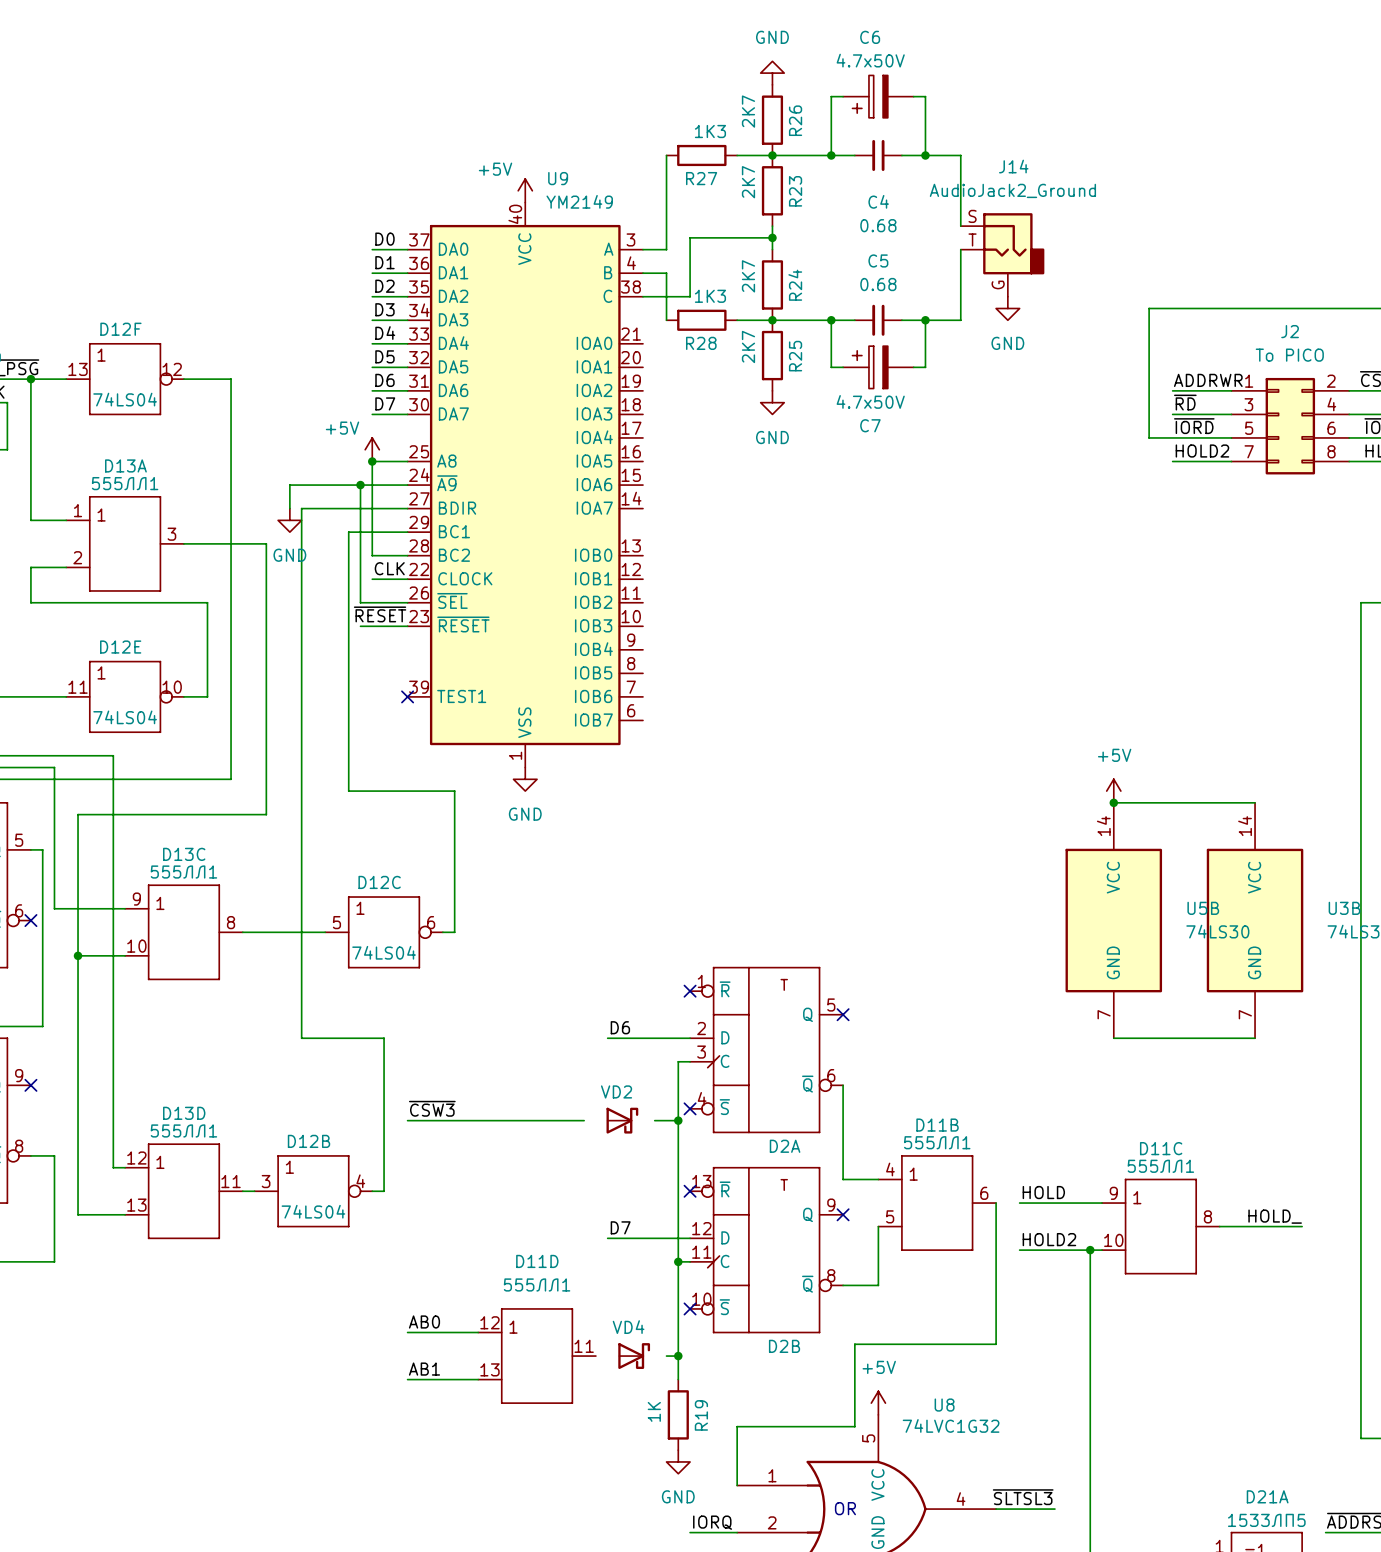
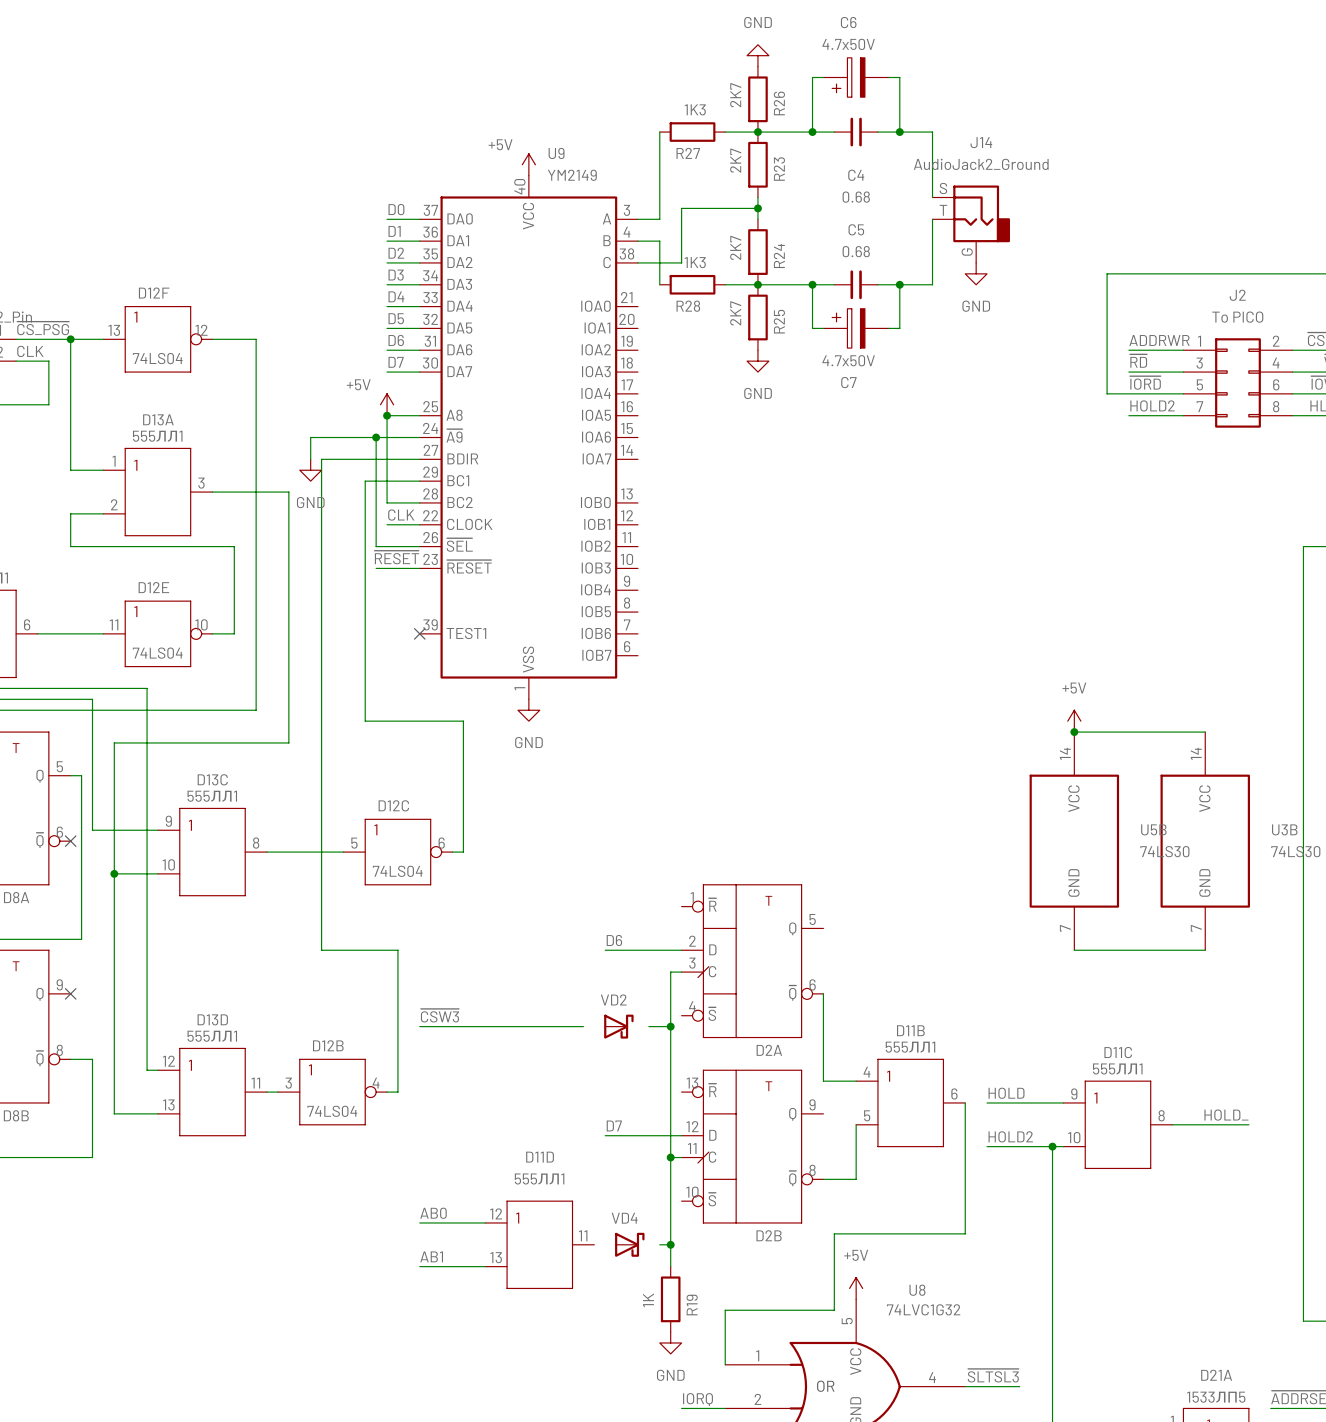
no-connect mark: (690, 991) -> none
no-connect mark: (843, 1014) -> none
no-connect mark: (690, 1108) -> none
no-connect mark: (690, 1191) -> none
no-connect mark: (843, 1214) -> none
no-connect mark: (690, 1308) -> none

